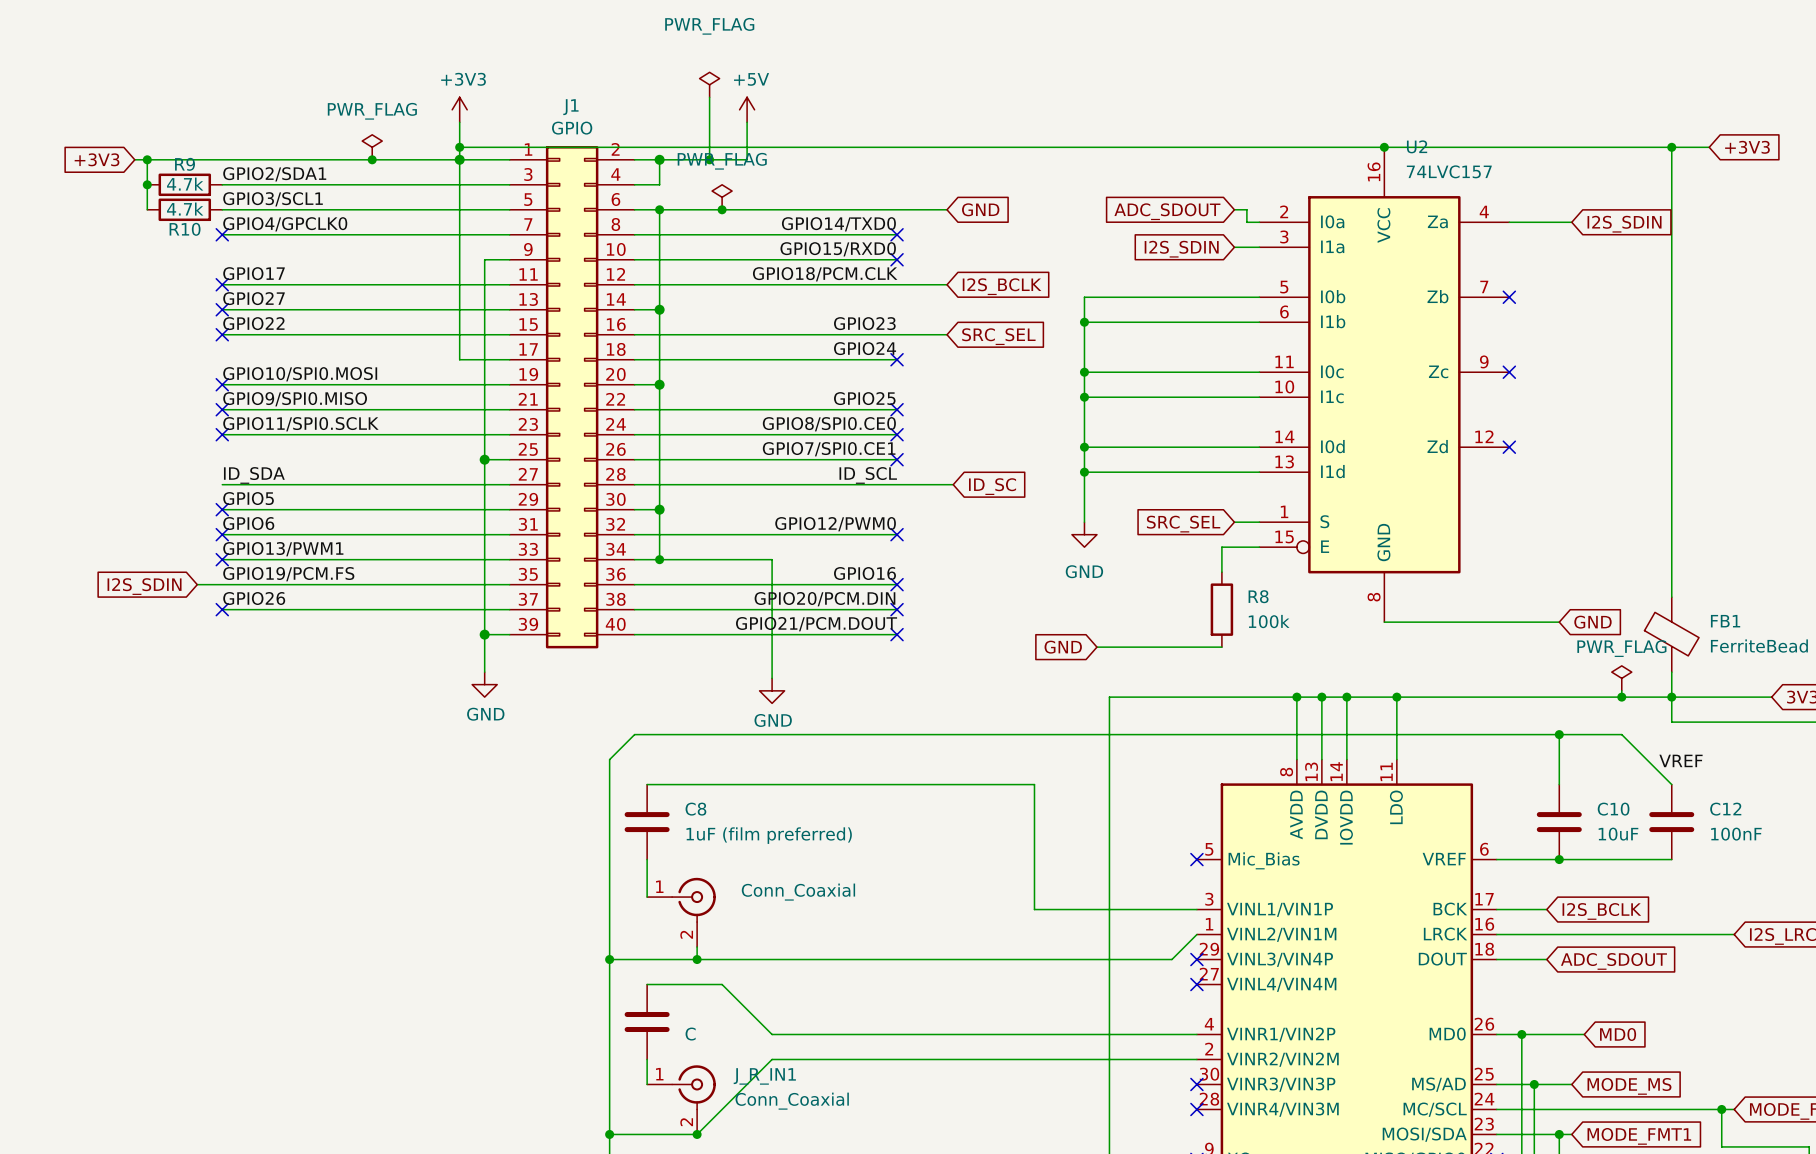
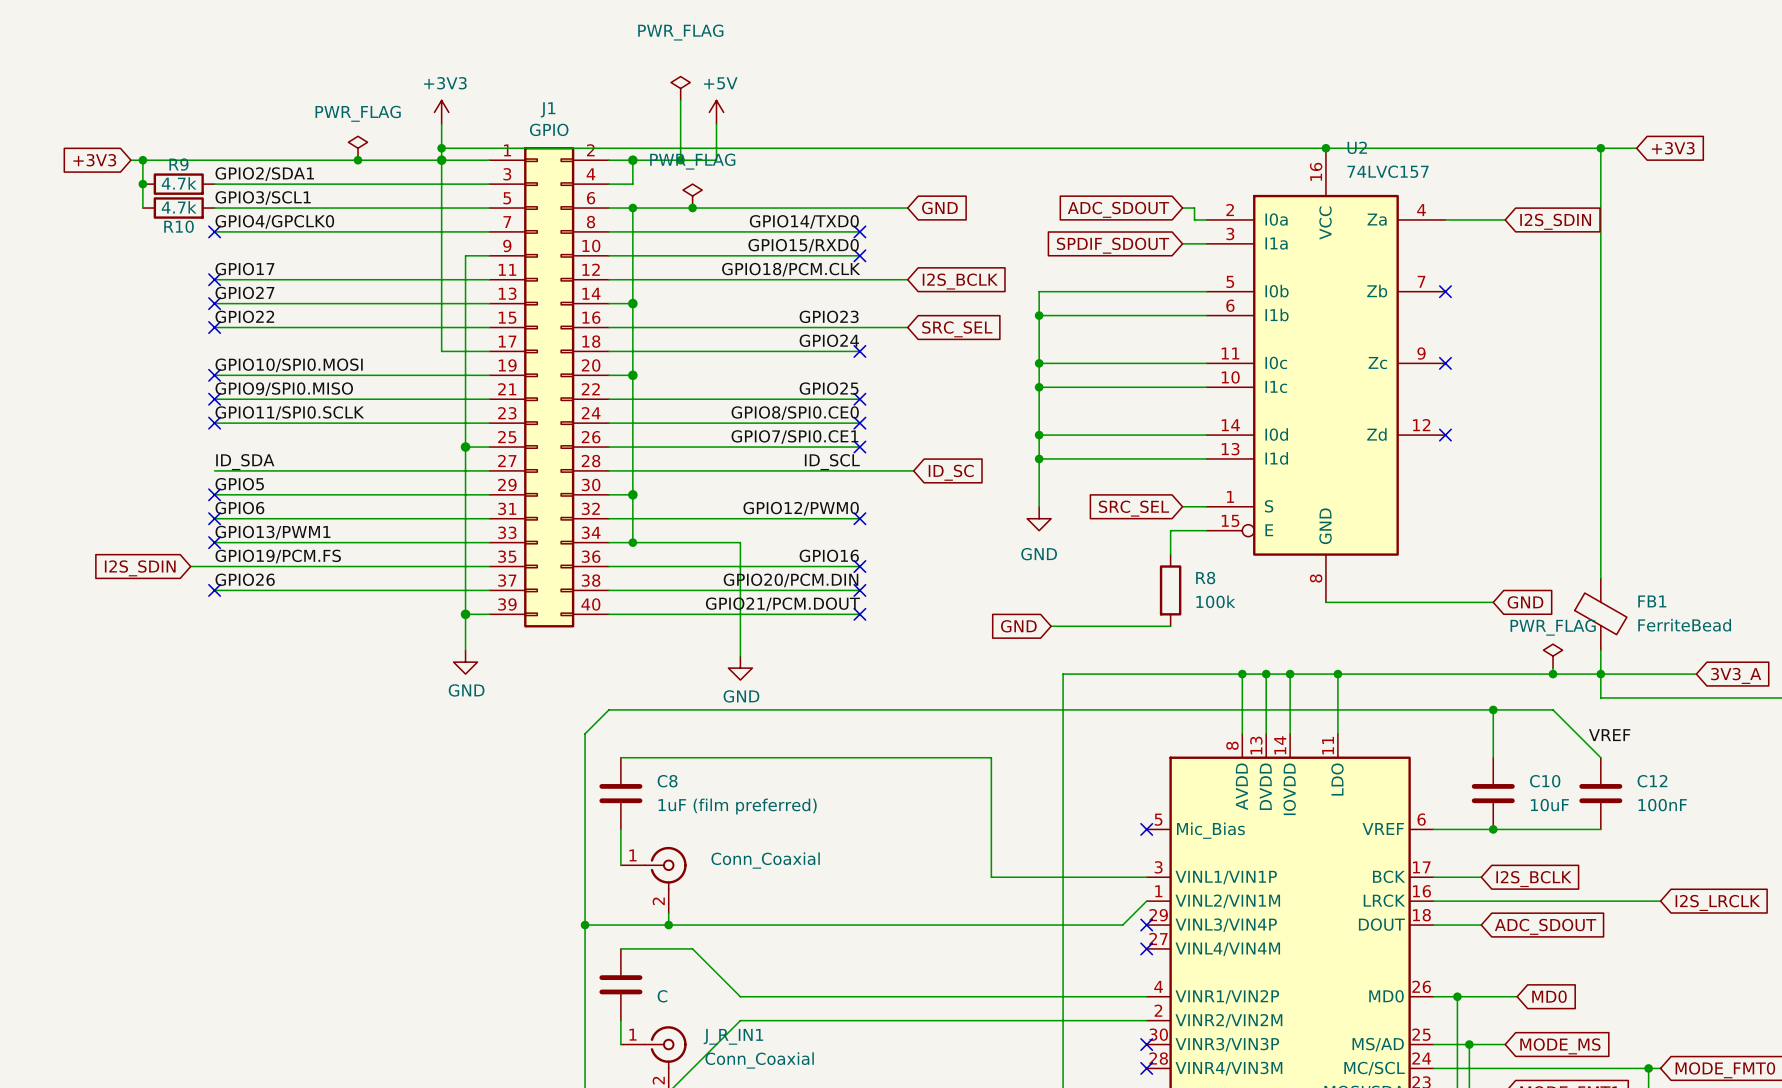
global label: I2S_SDIN (1181, 249) -> SPDIF_SDOUT (1113, 245)

